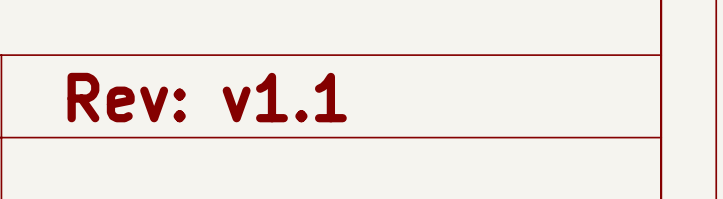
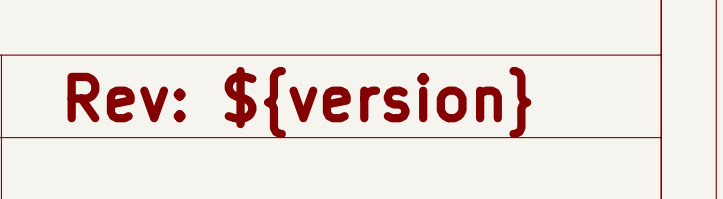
title block: Rev: v1.1 (207, 97) -> Rev: ${version} (299, 102)

